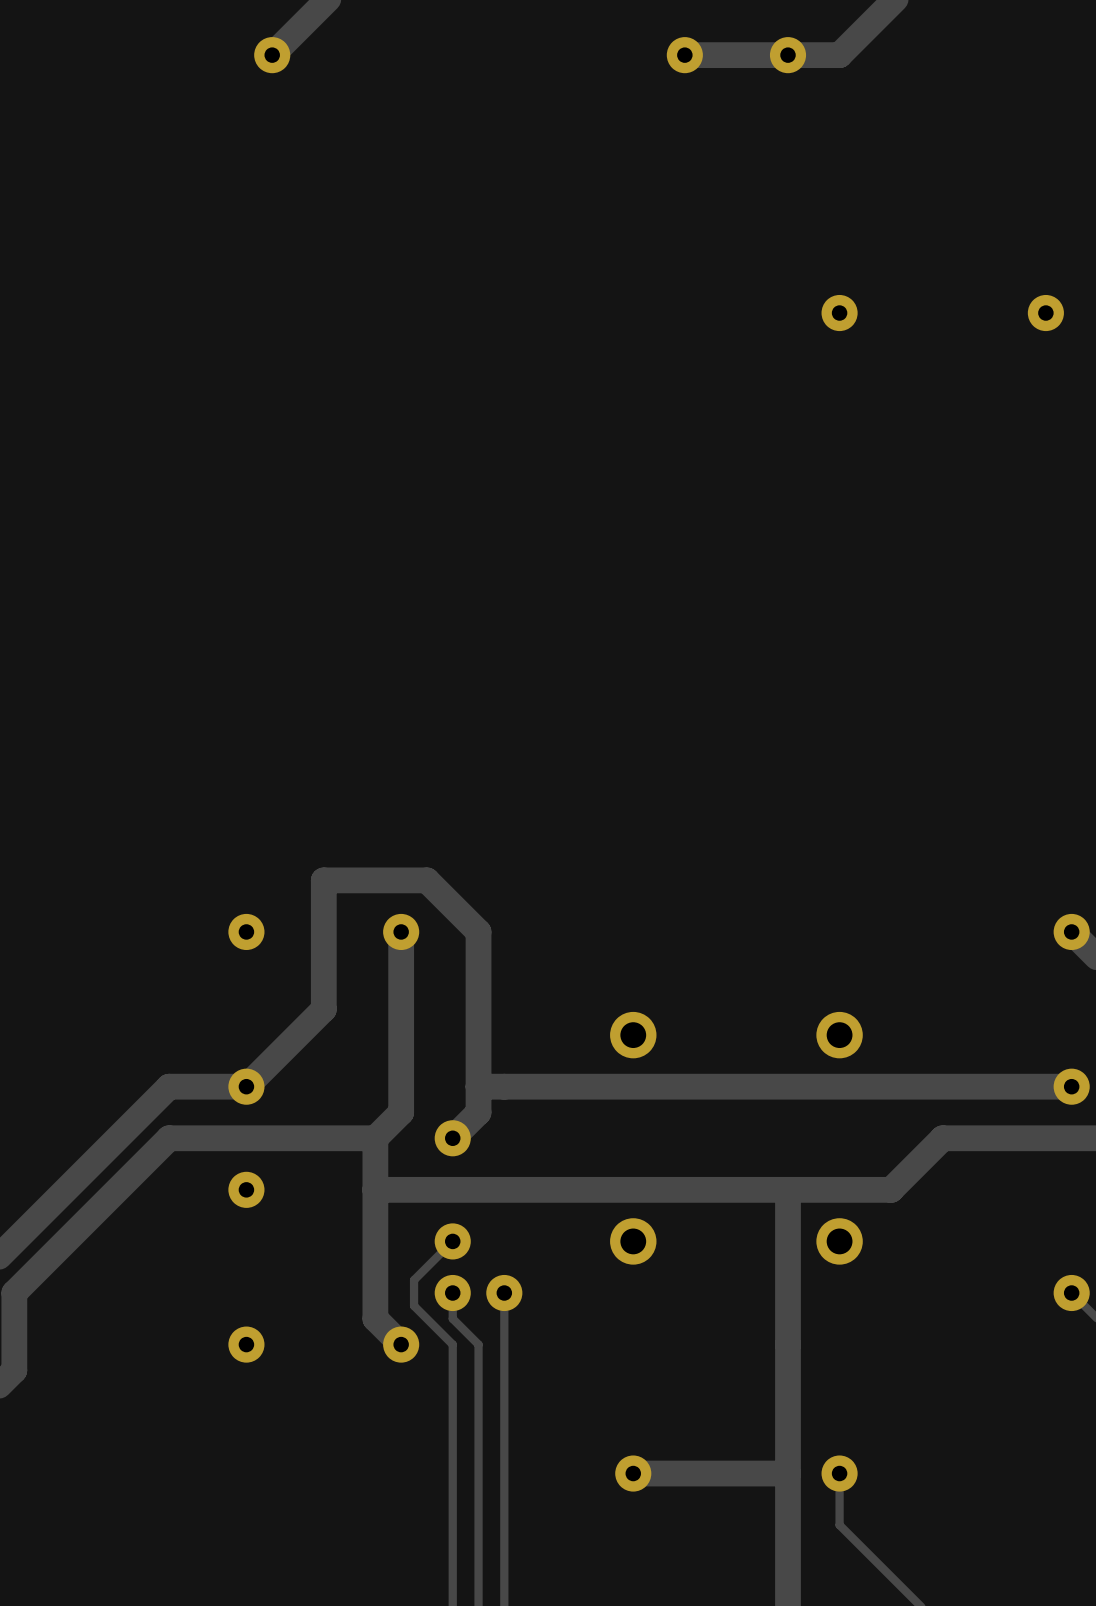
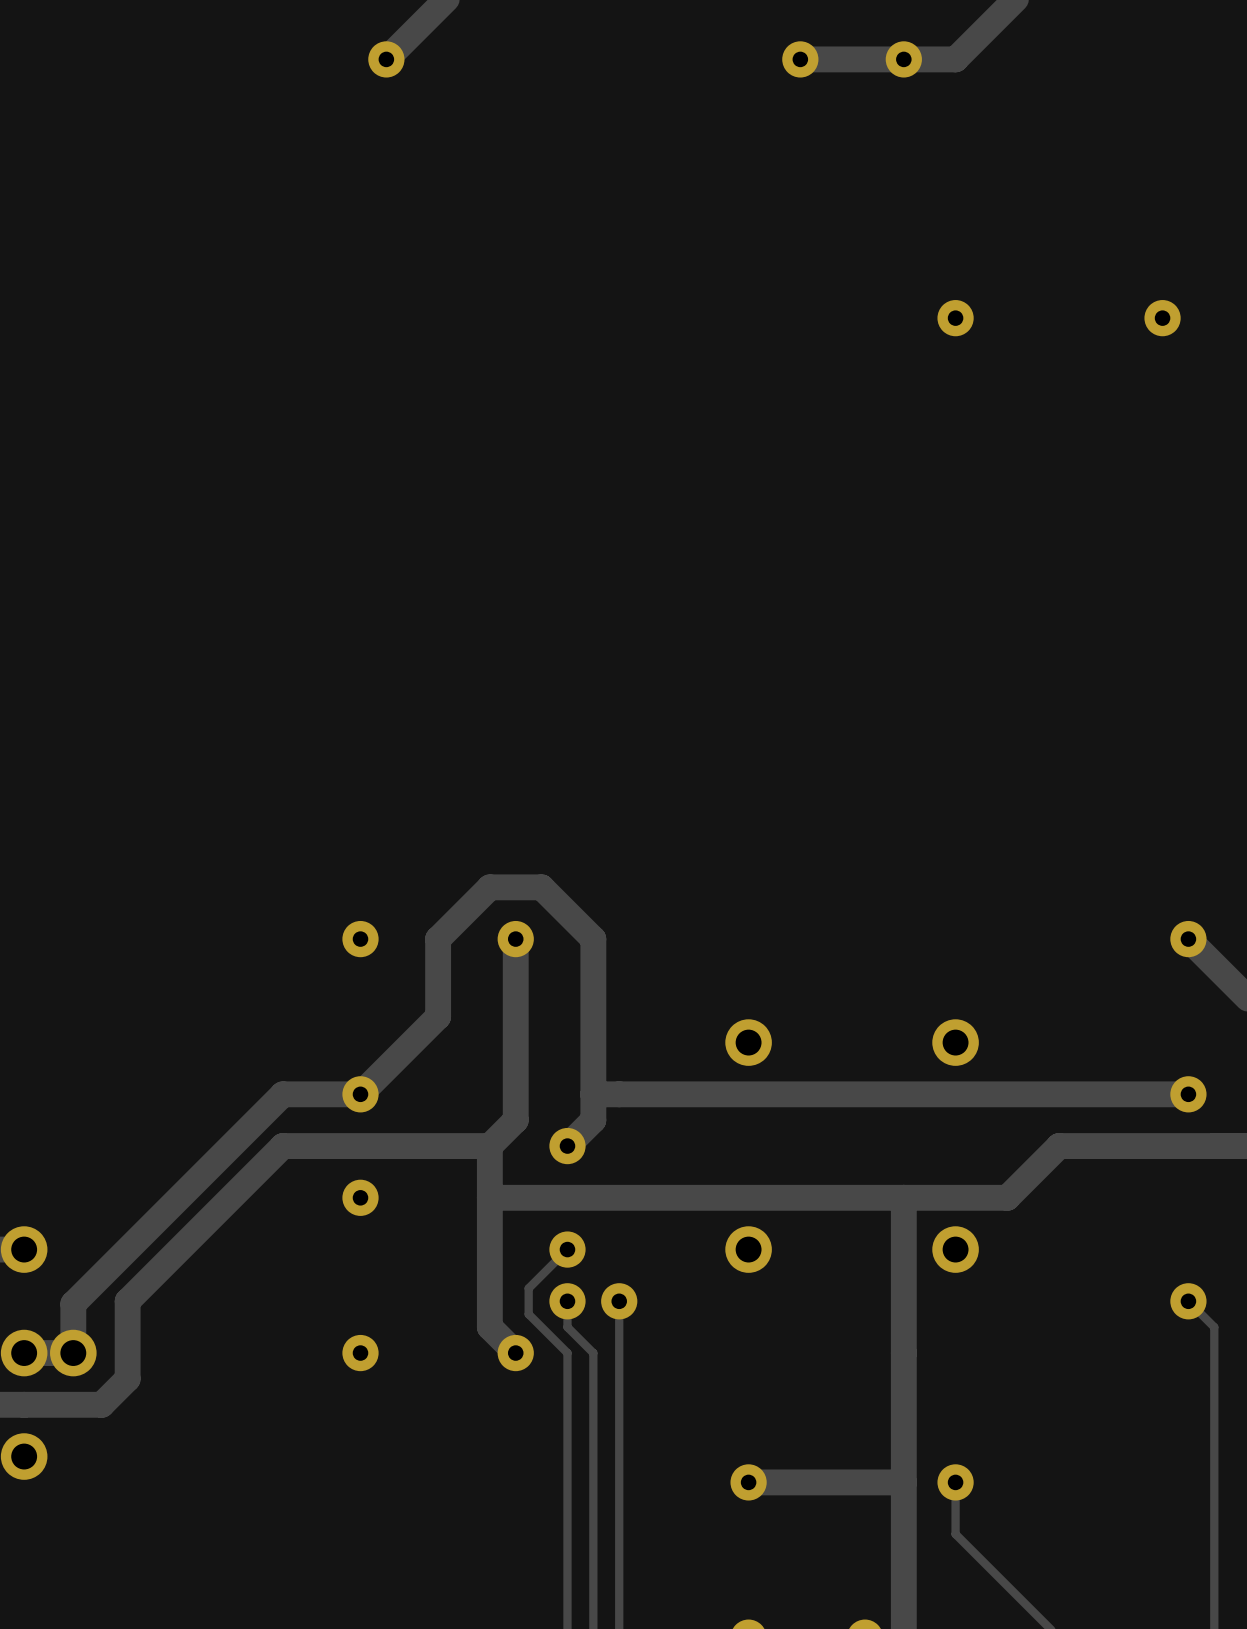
track: (375, 880) (323, 880) (323, 931) -> (489, 887) (438, 939)

